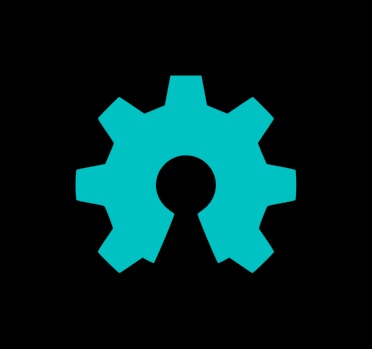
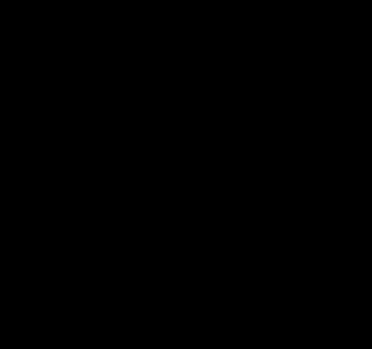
drawing: [75, 75, 297, 273] -> none

